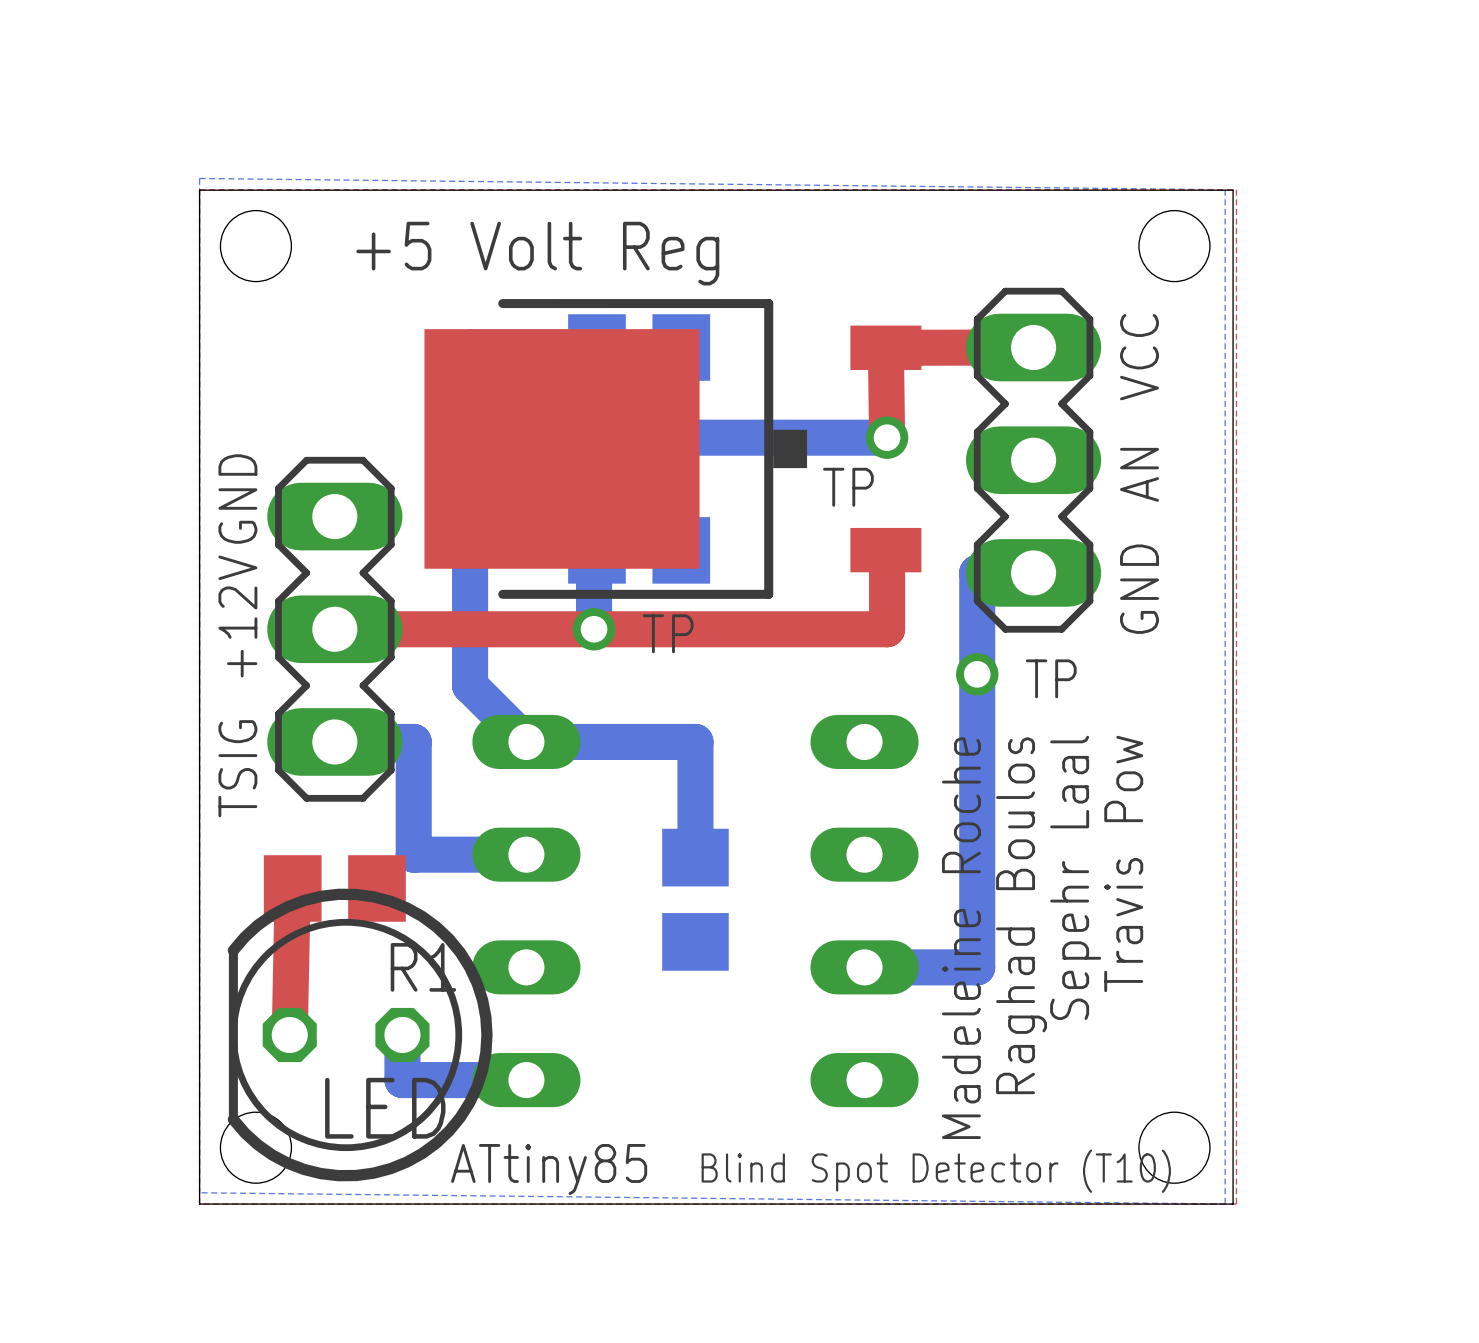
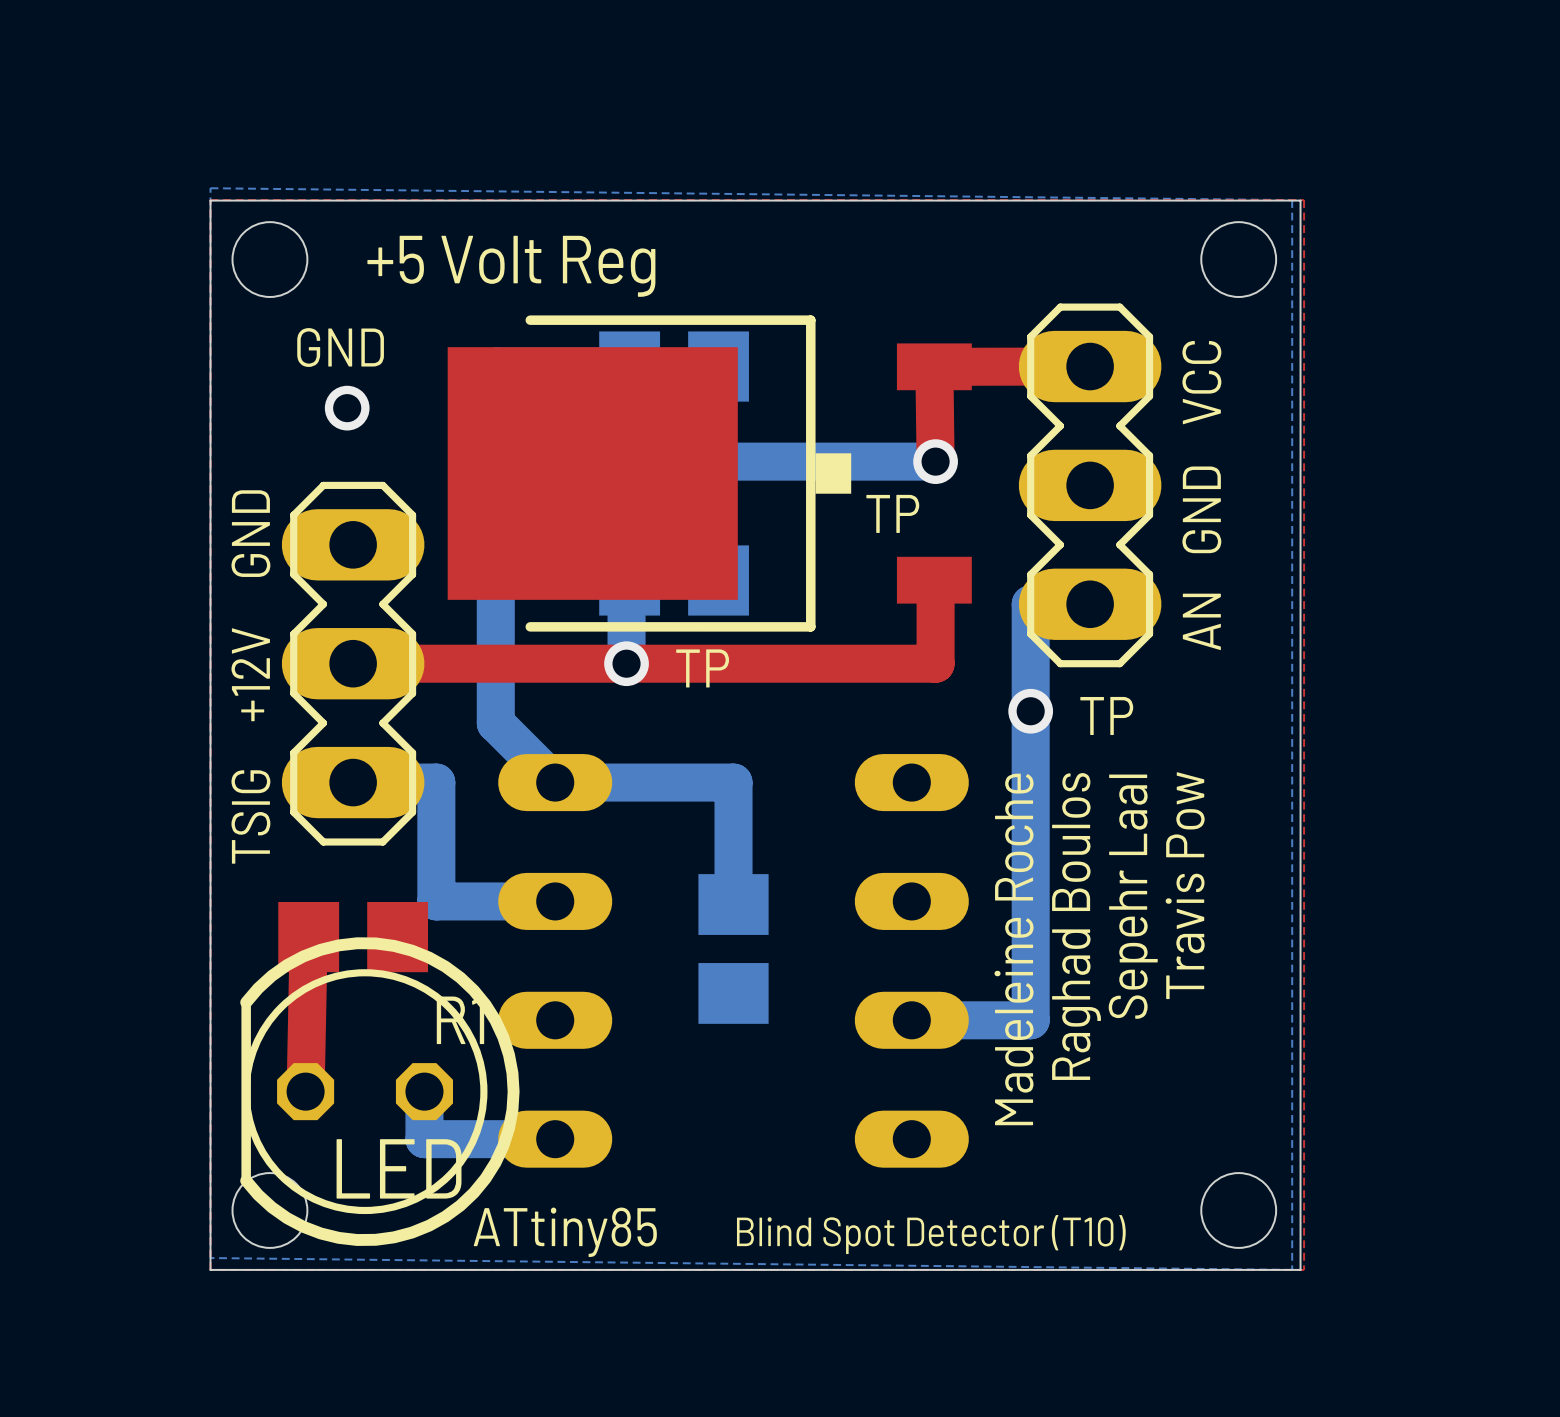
text: none -> GND (340, 347)
via: none -> (347, 408)
text position: AN (1139, 474) -> AN (1201, 621)
text position: GND (1139, 589) -> GND (1201, 509)

